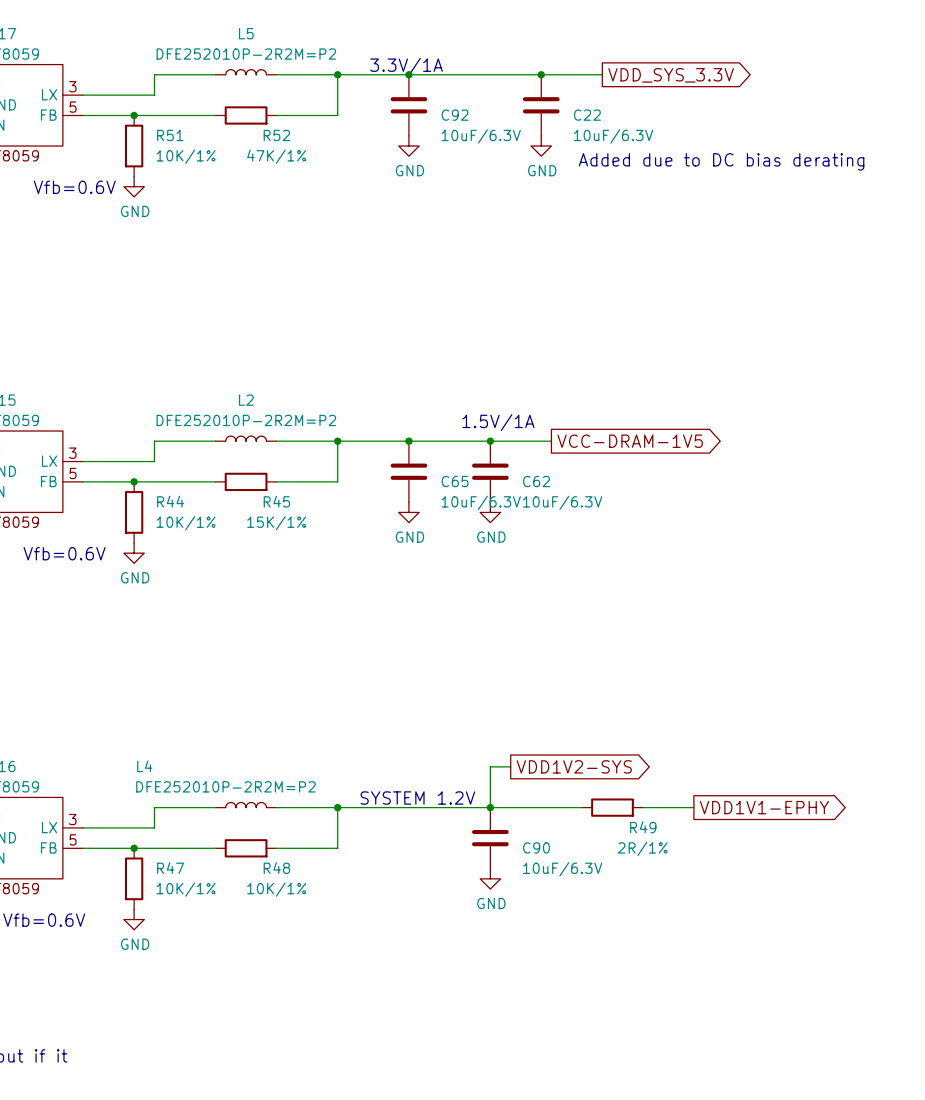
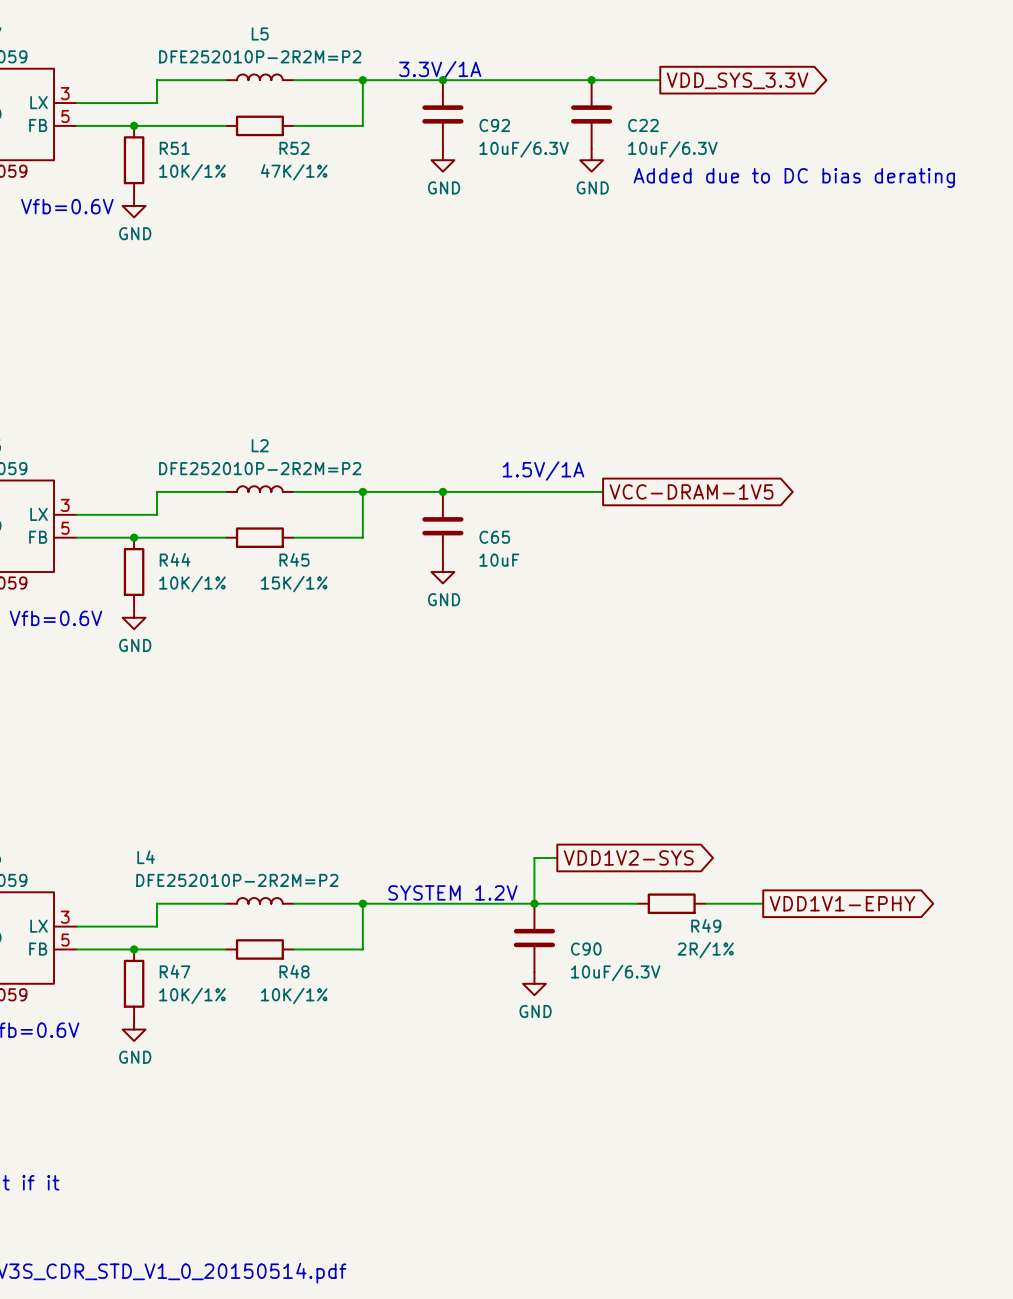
junction: (490, 441) -> none
C62: 10uF/6.3V (490, 471) -> none
C65 value: 10uF/6.3V (481, 502) -> 10uF (499, 560)
power symbol: GND (490, 512) -> none

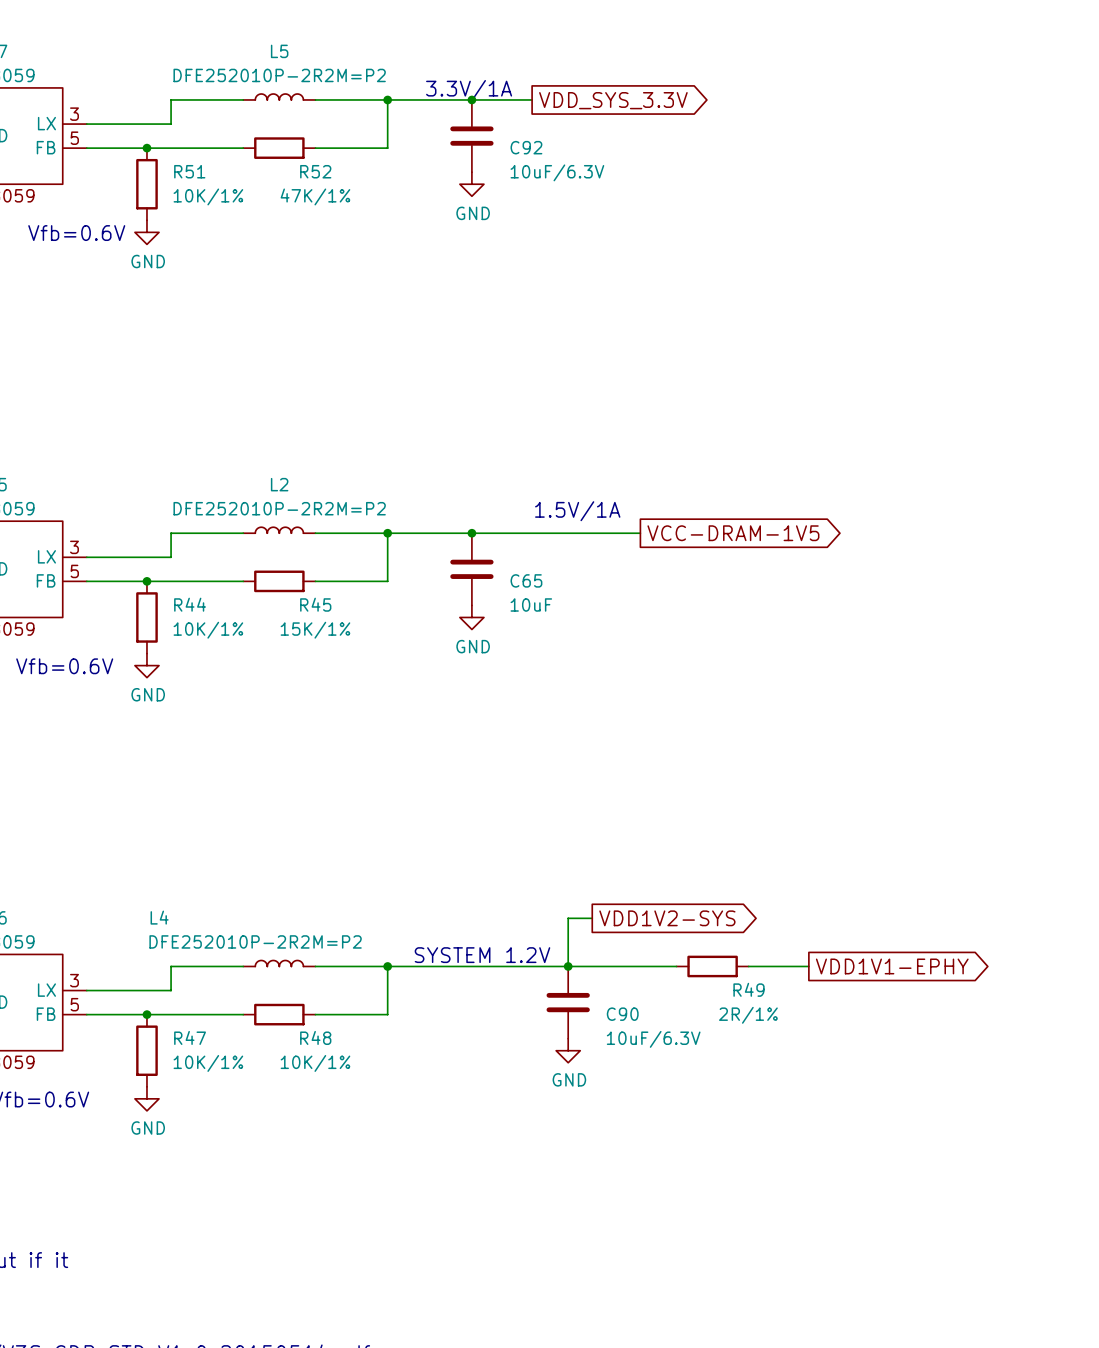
wire: (500, 80) (660, 80) -> none
junction: (591, 80) -> none
global label position: VDD_SYS_3.3V (737, 80) -> VDD_SYS_3.3V (613, 100)
C22: 10uF/6.3V (591, 114) -> none
power symbol: GND (591, 160) -> none
text: Added due to DC bias derating (794, 178) -> none

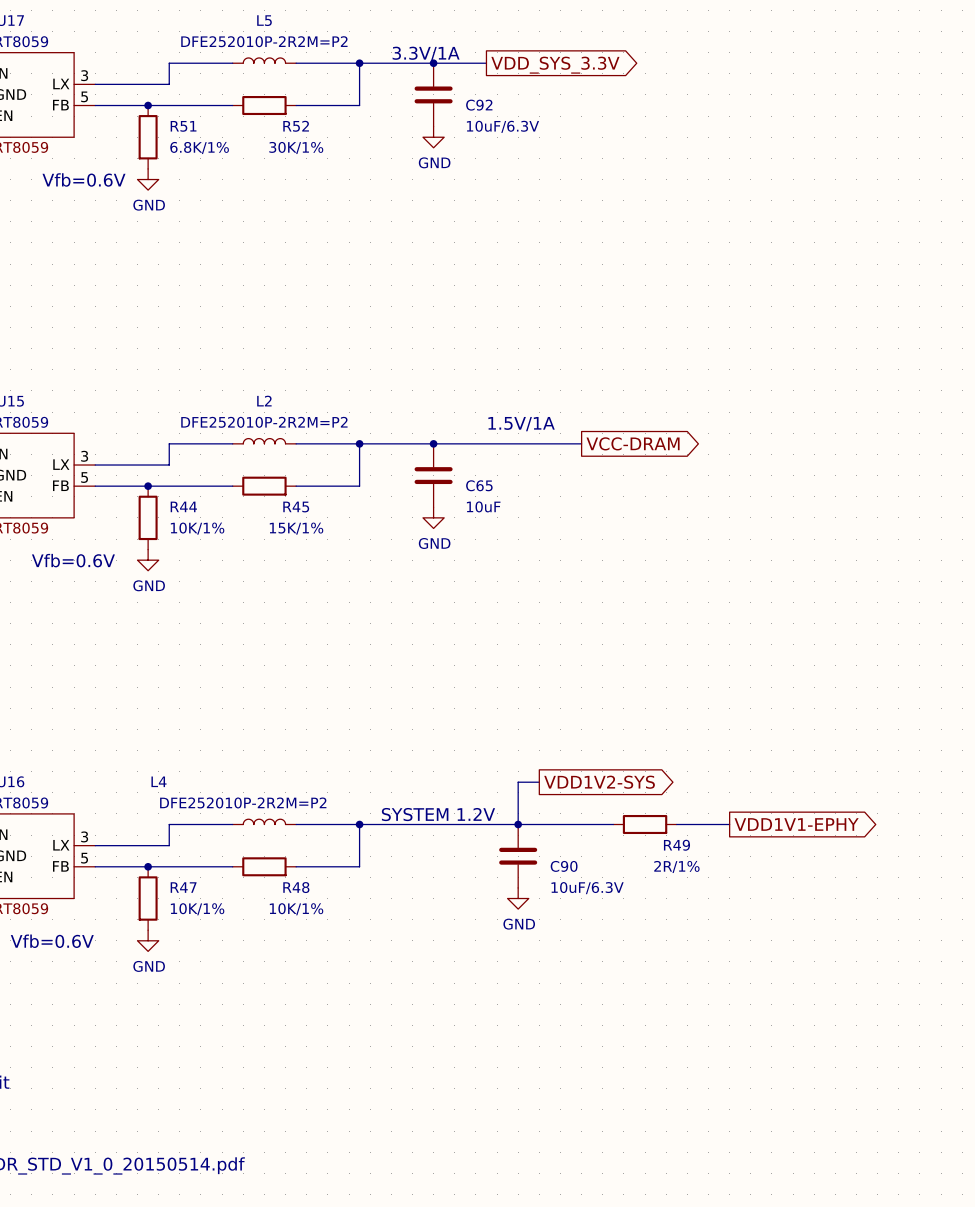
R51 value: 10K/1% (208, 196) -> 6.8K/1% (199, 147)
R52 value: 47K/1% (315, 196) -> 30K/1% (296, 147)
global label: VCC-DRAM-1V5 (733, 533) -> VCC-DRAM (633, 443)

